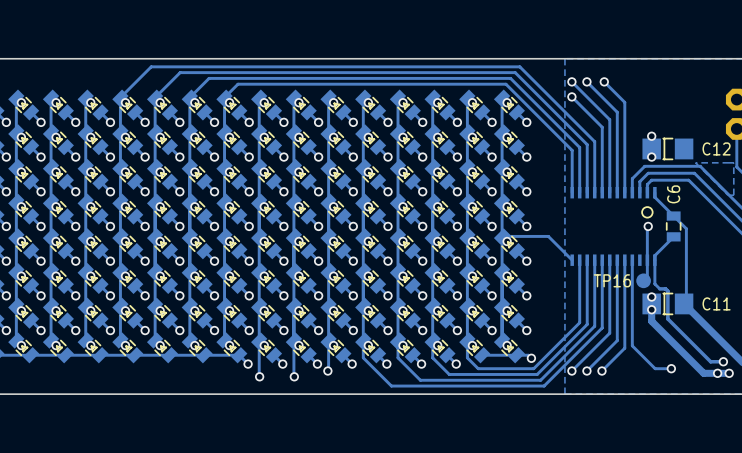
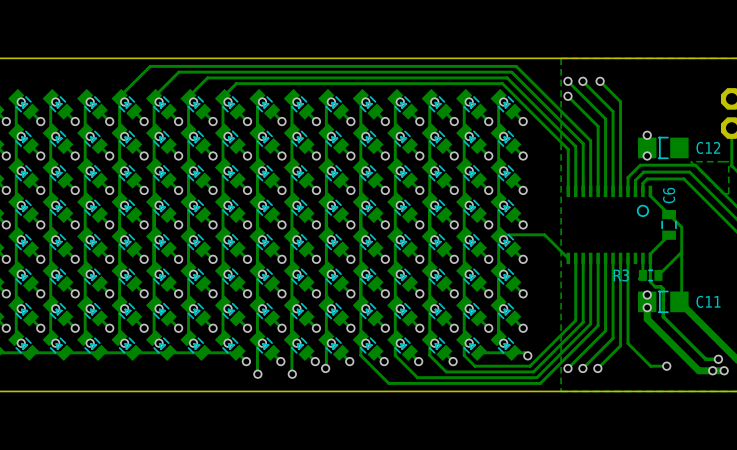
track: (648, 226) (647, 260) -> none
via: (648, 226) -> none
track: none -> (681, 252) (658, 275)
R3: none -> (650, 275)
TP16: (643, 280) -> none

